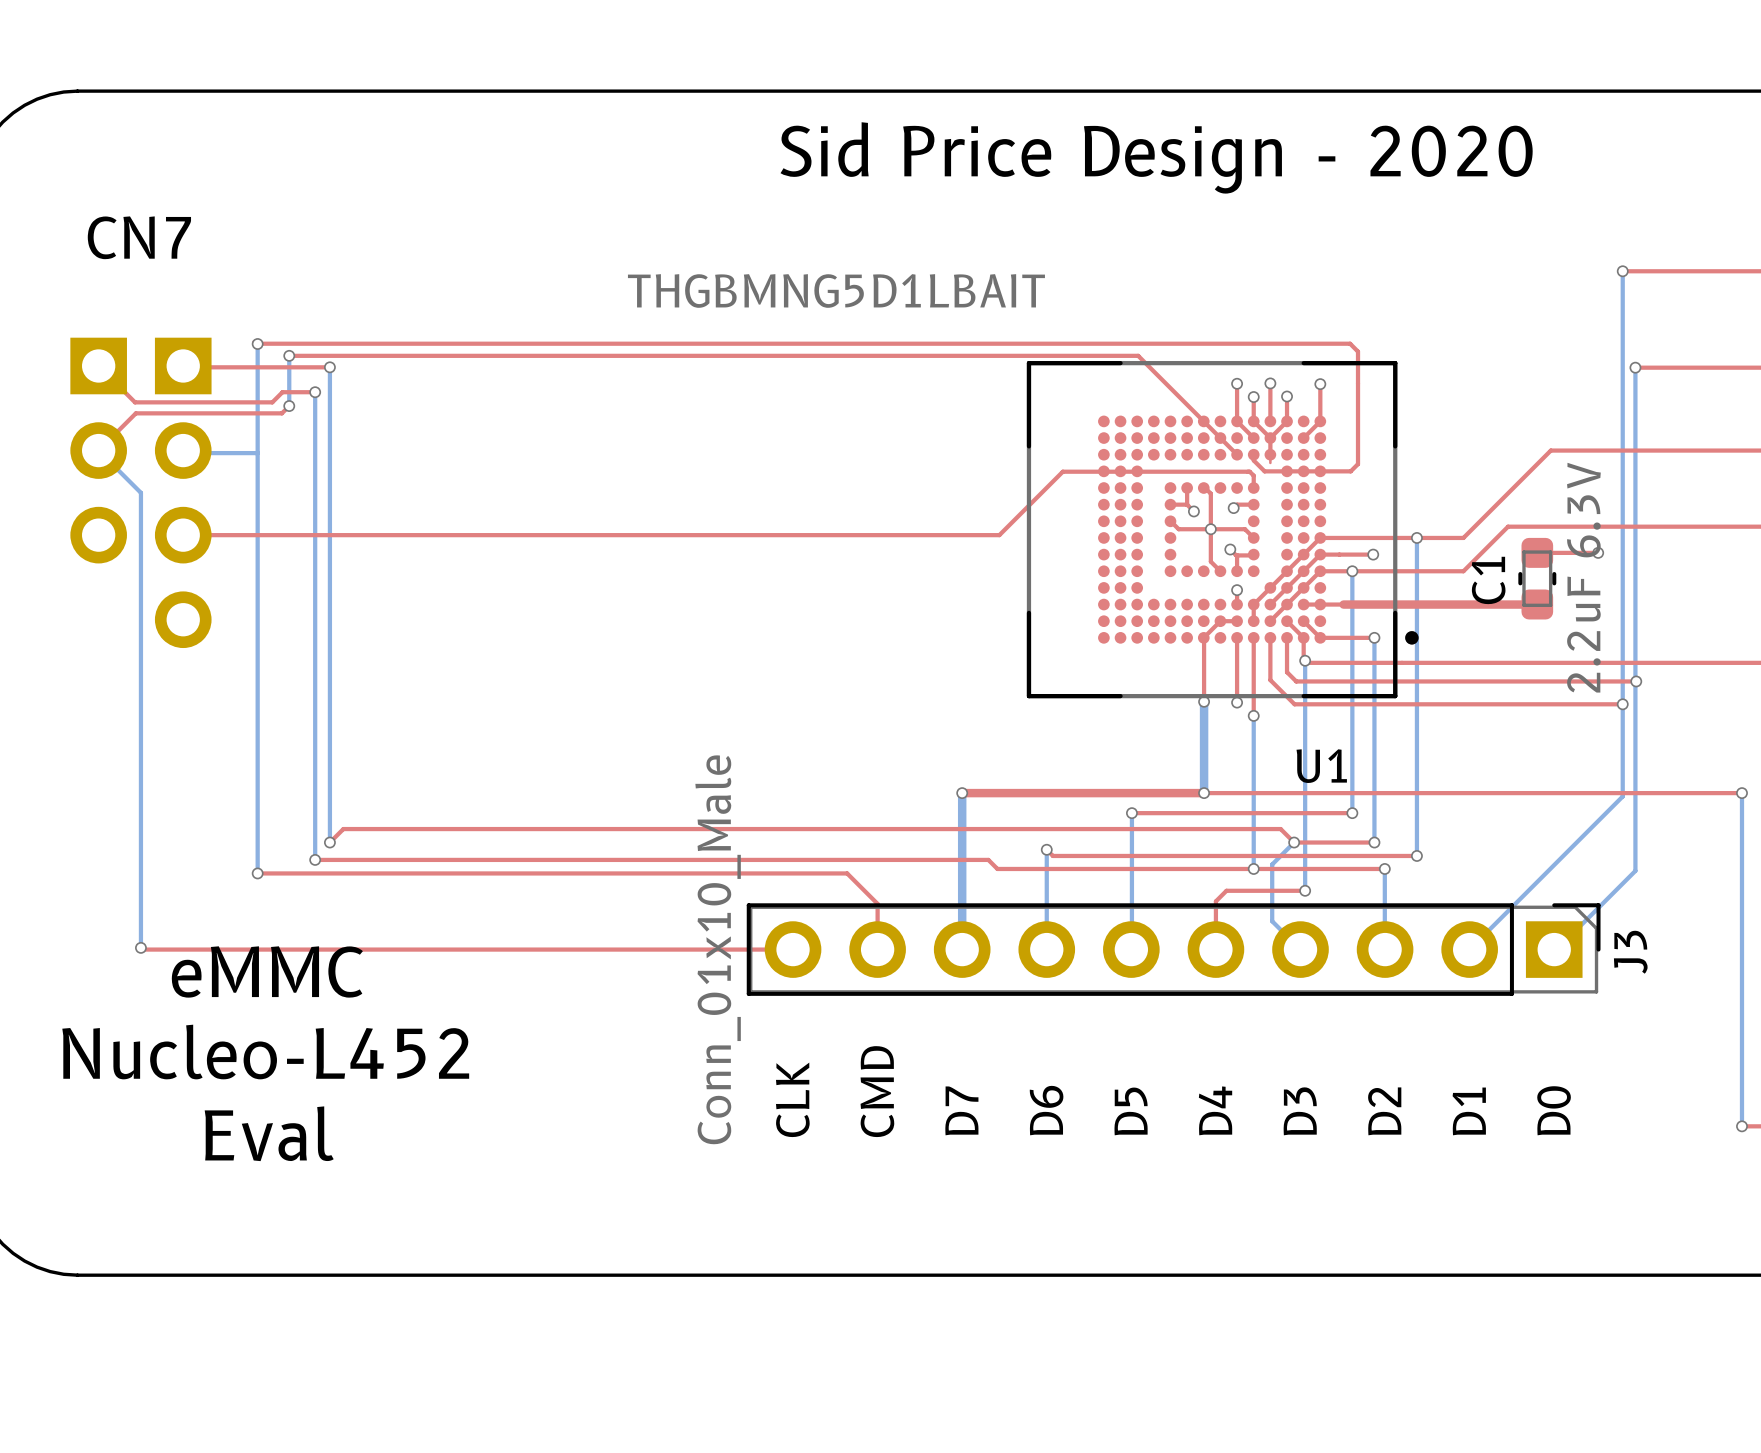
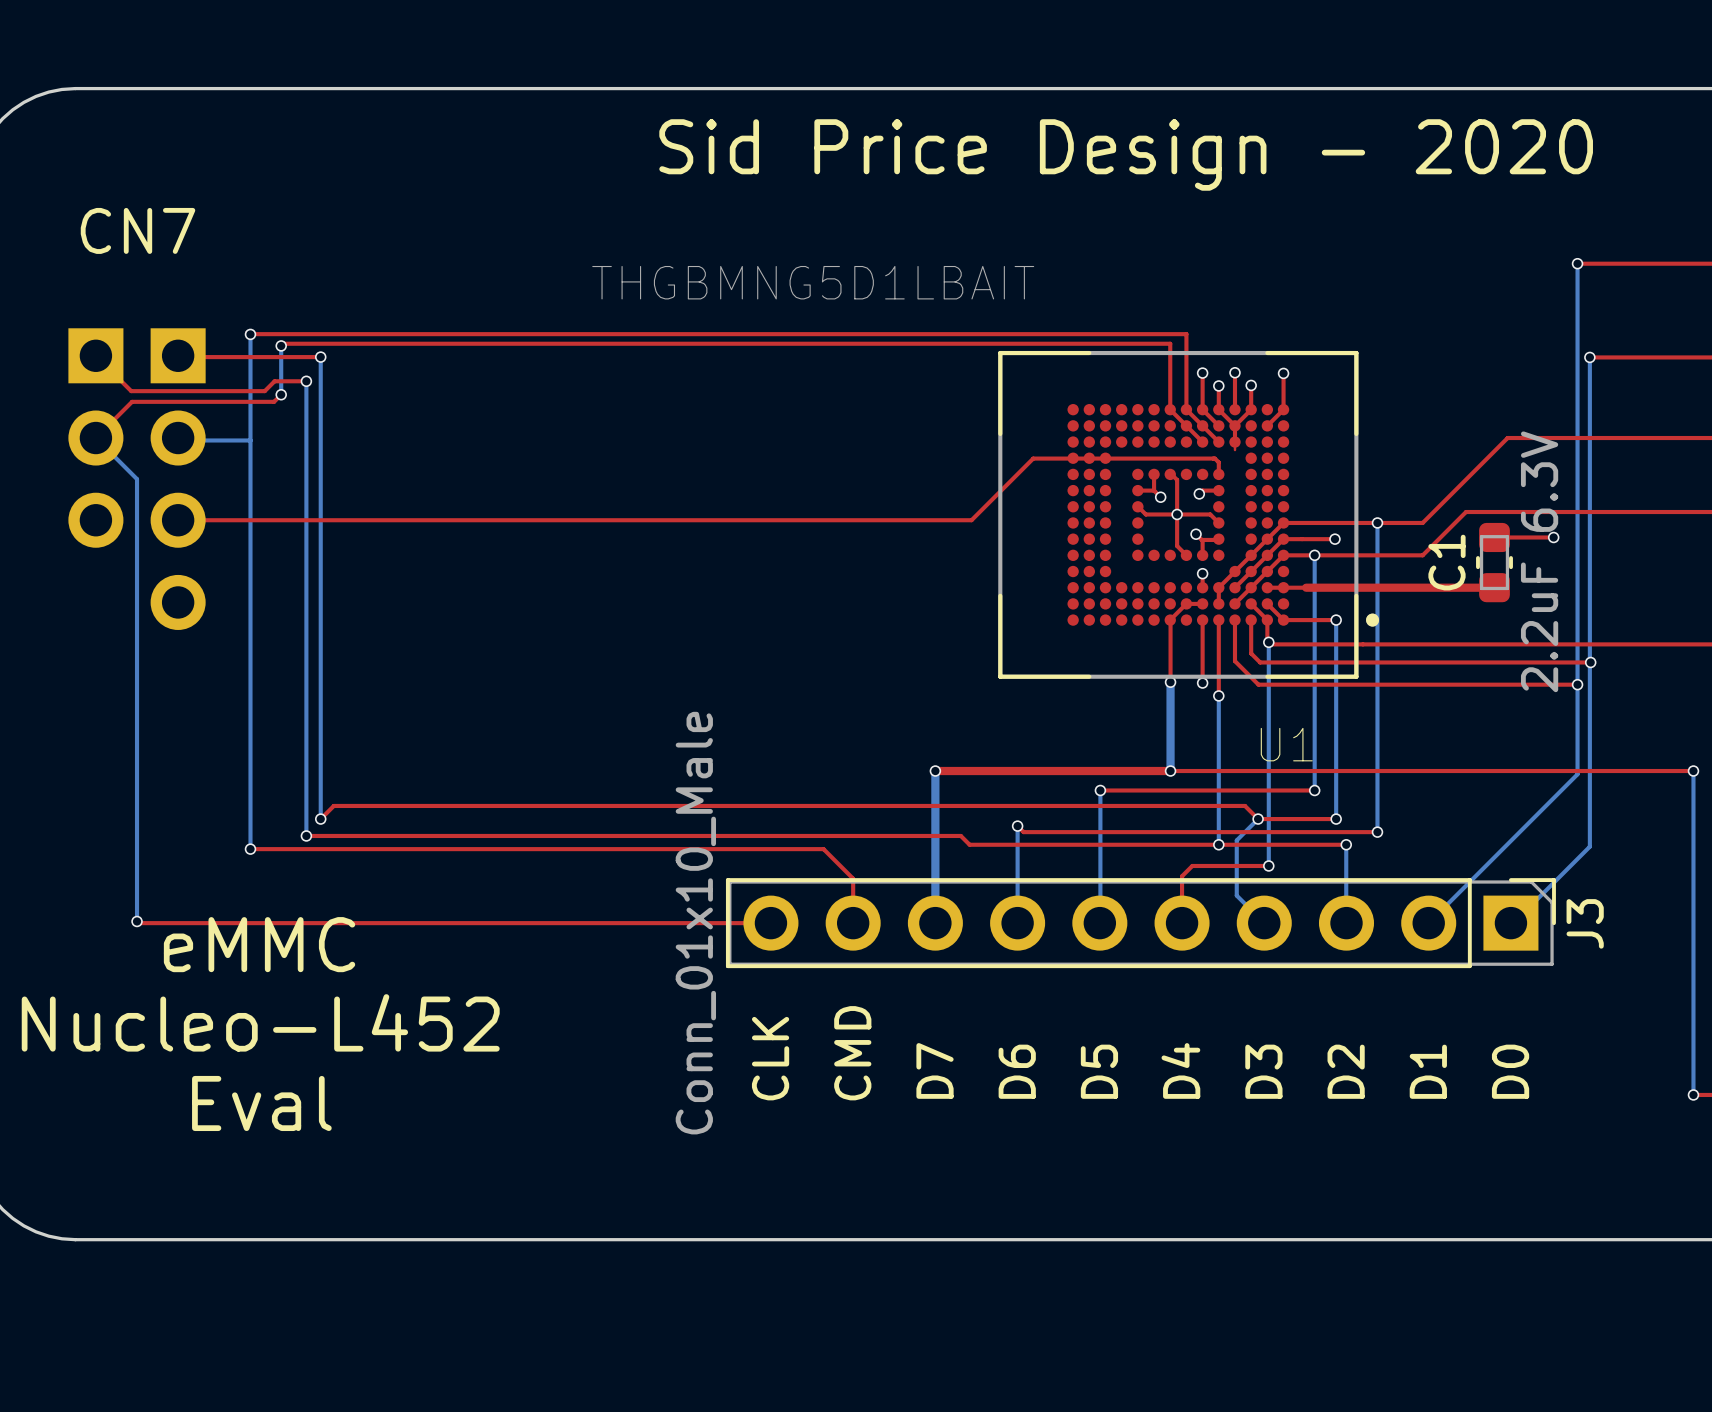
top track: (1220, 343) (1350, 343) (1358, 351) (1358, 464) (1350, 471) (1264, 471) (1253, 460) (1253, 454) -> (1186, 334) (1186, 409) (1218, 442)
top track: (289, 355) (1138, 355) (1203, 421) -> (281, 343) (1170, 343) (1170, 409)

